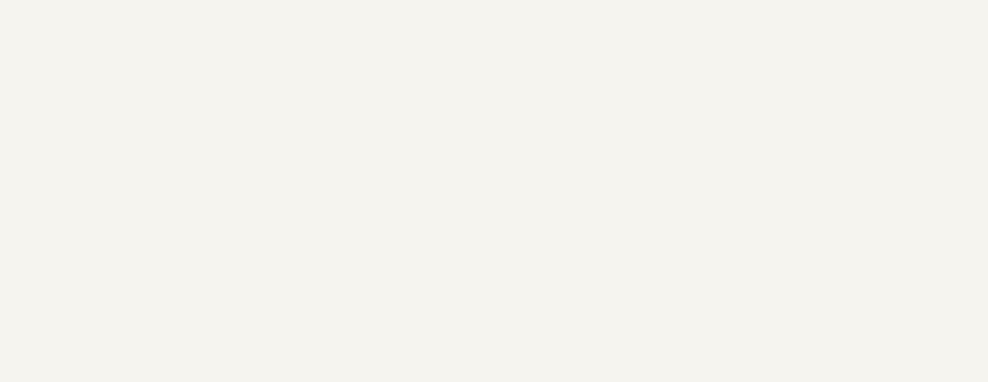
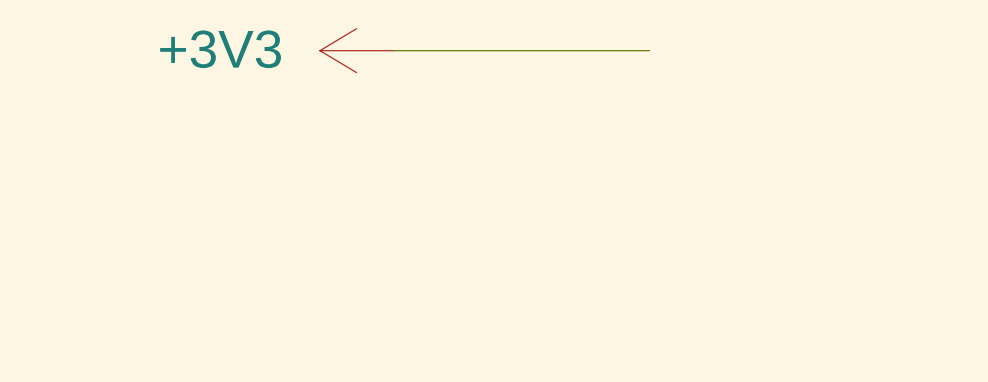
power symbol: none -> +3V3 (356, 50)
wire: none -> (393, 50) (649, 50)

